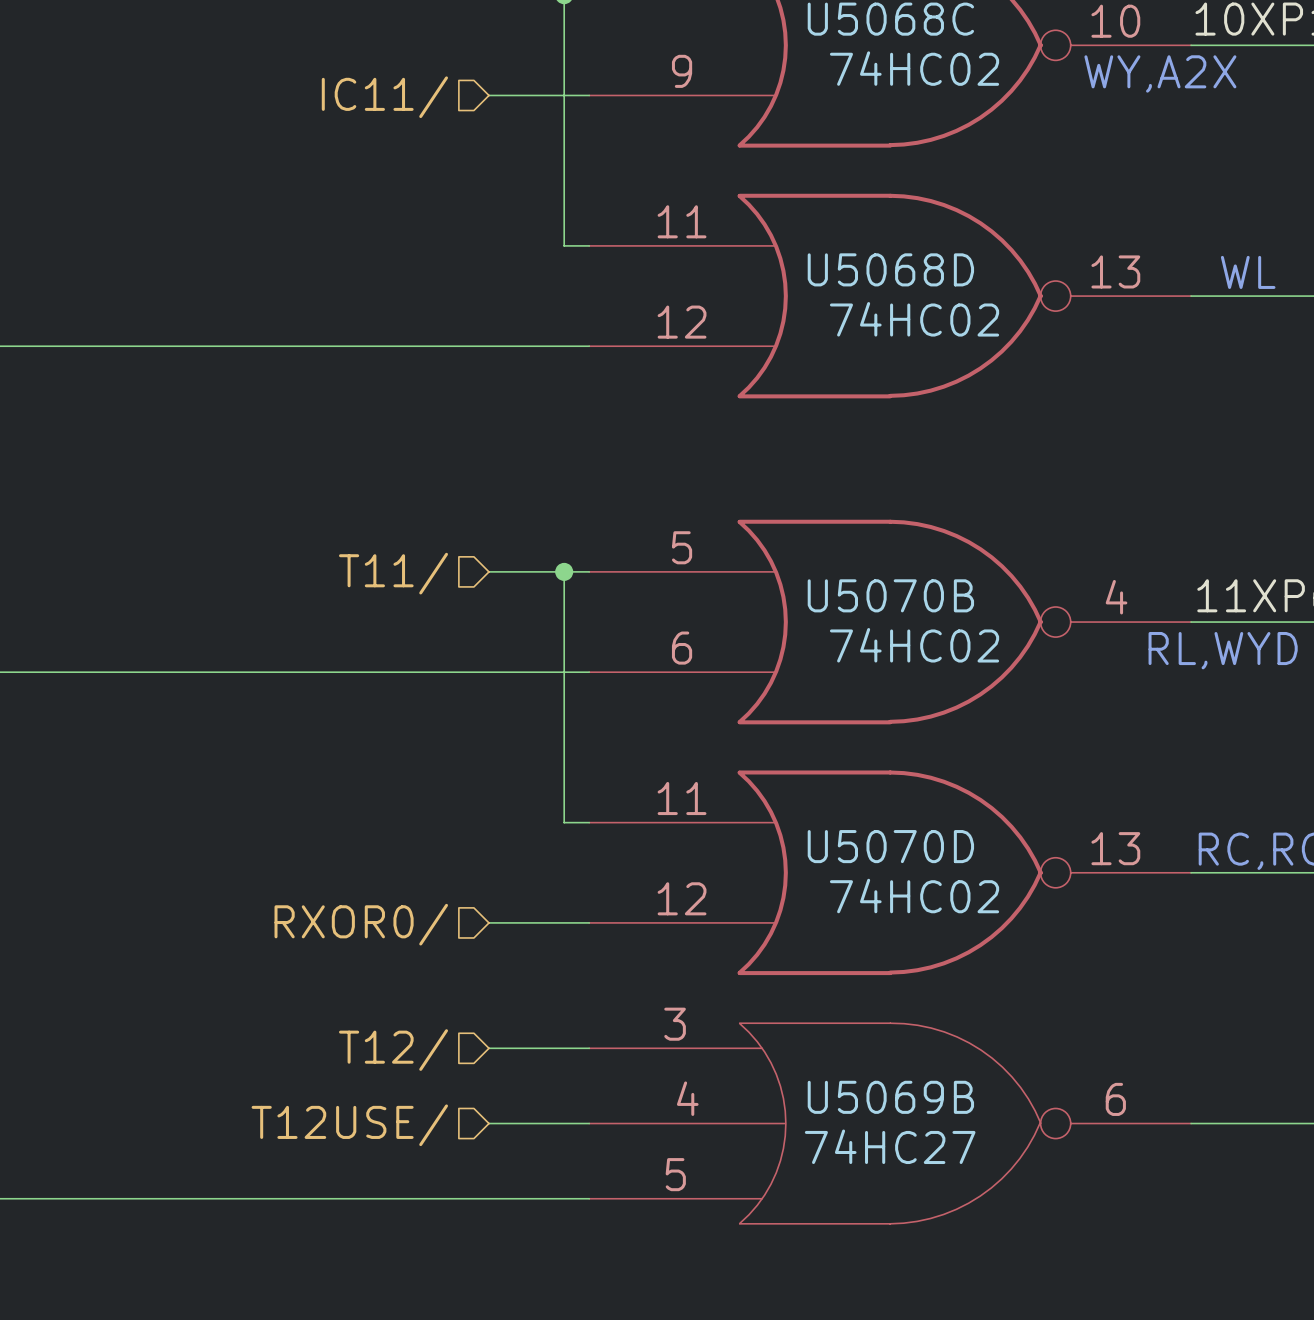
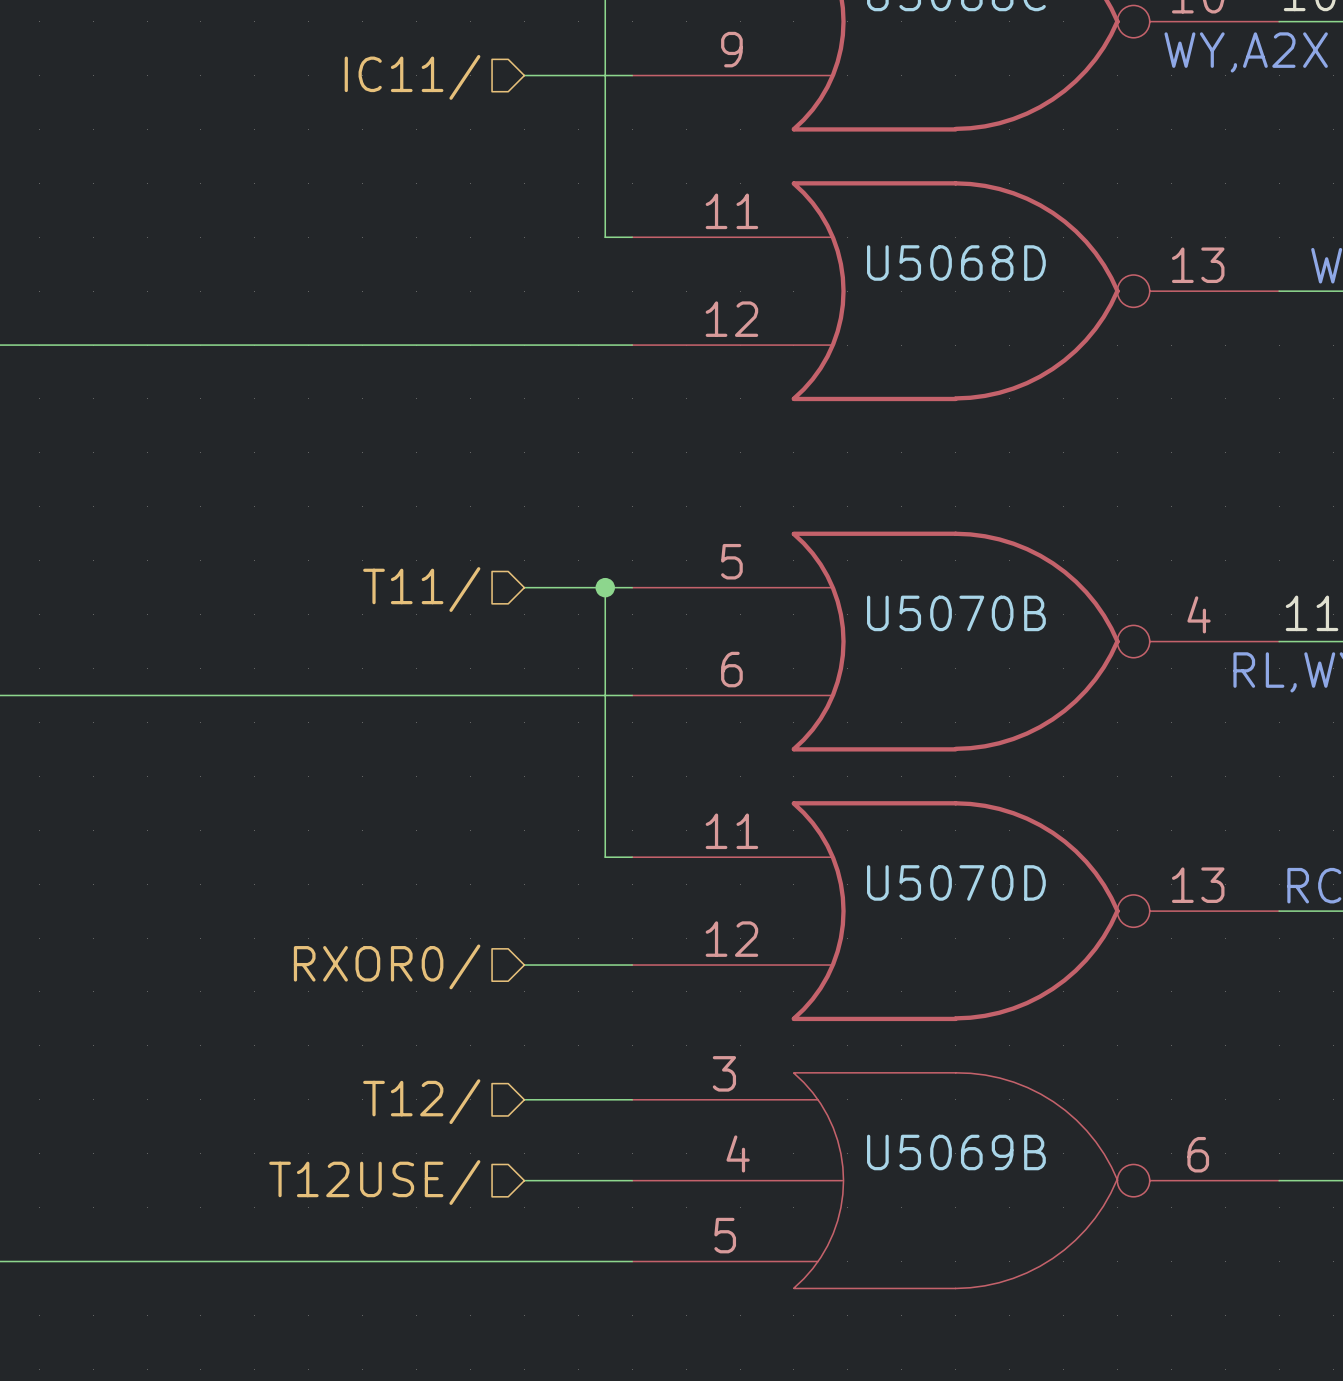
U5068C value: 74HC02 (914, 68) -> none
U5068D value: 74HC02 (914, 319) -> none
U5070B value: 74HC02 (914, 645) -> none
U5070D value: 74HC02 (914, 896) -> none
U5069B value: 74HC27 (890, 1146) -> none

